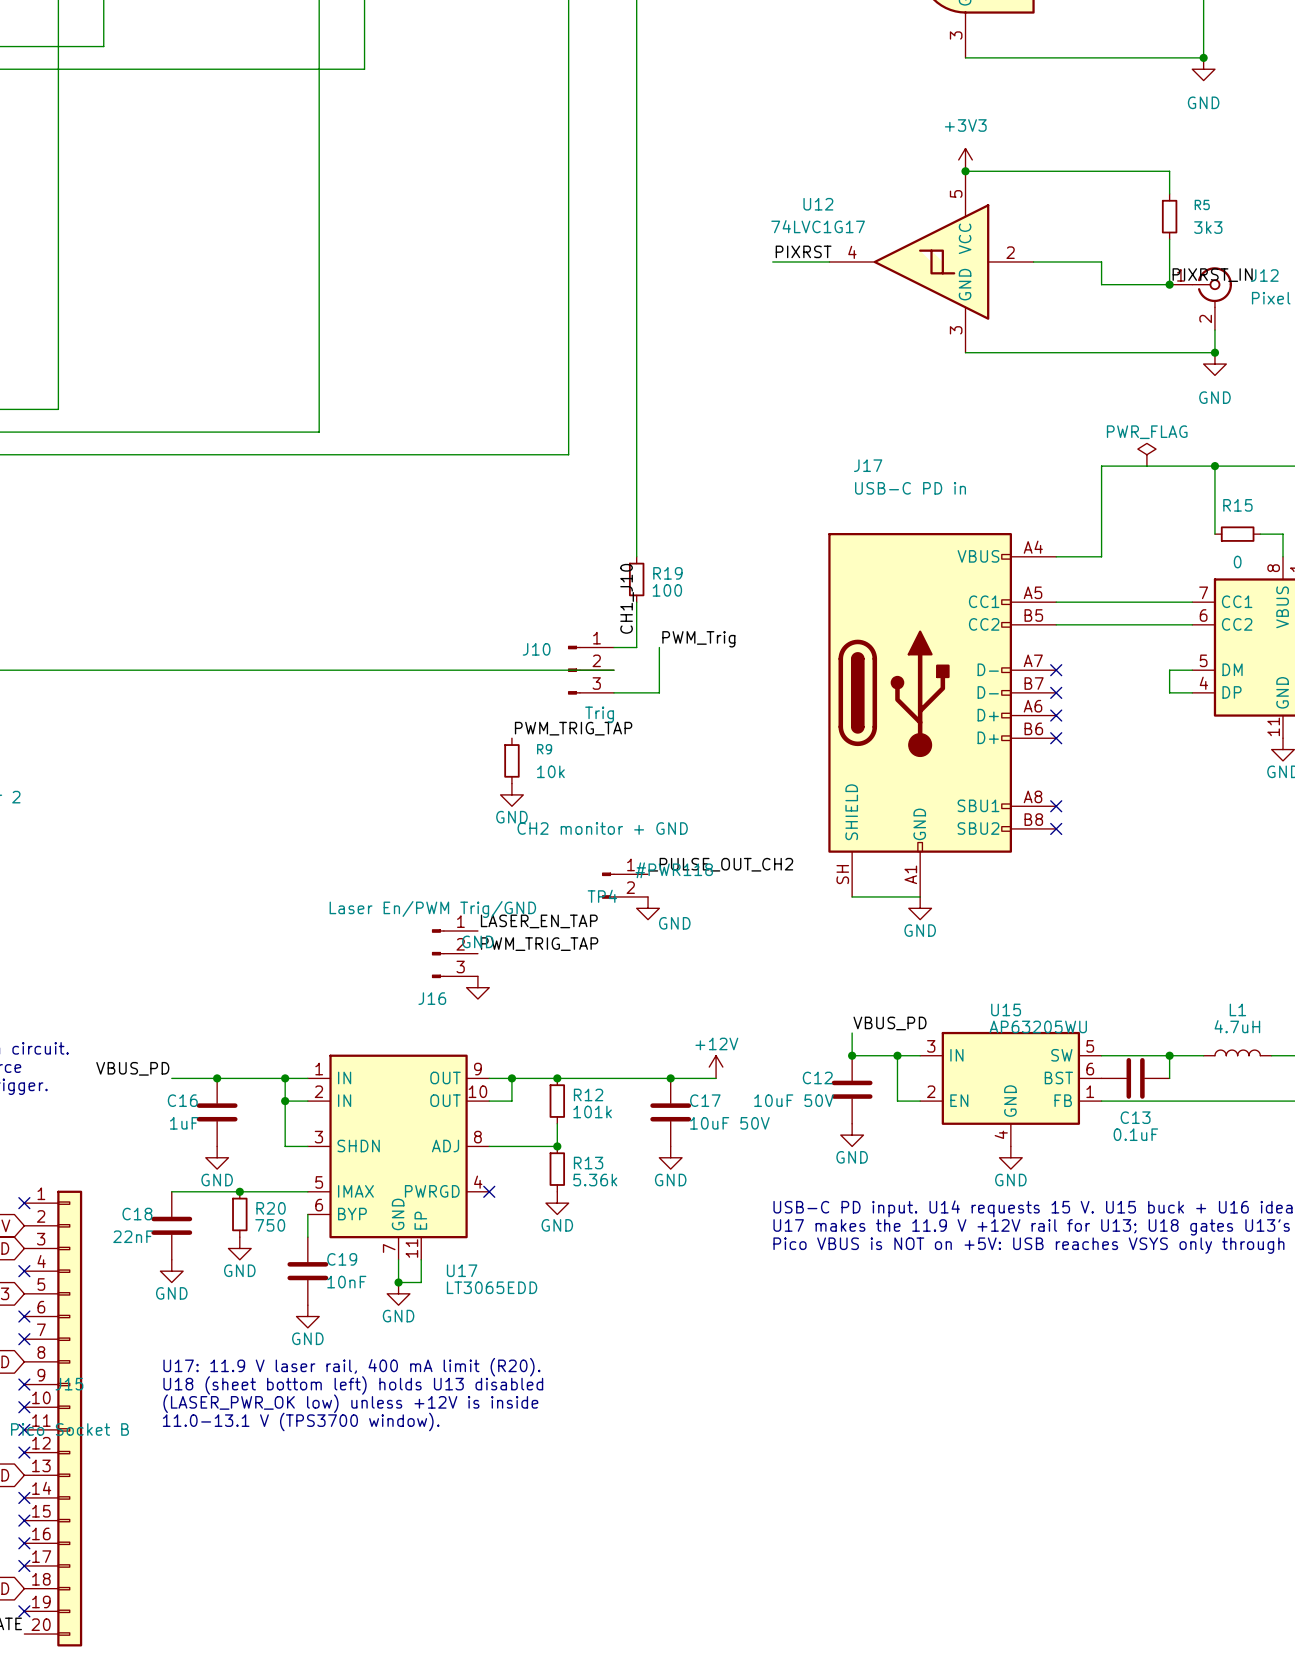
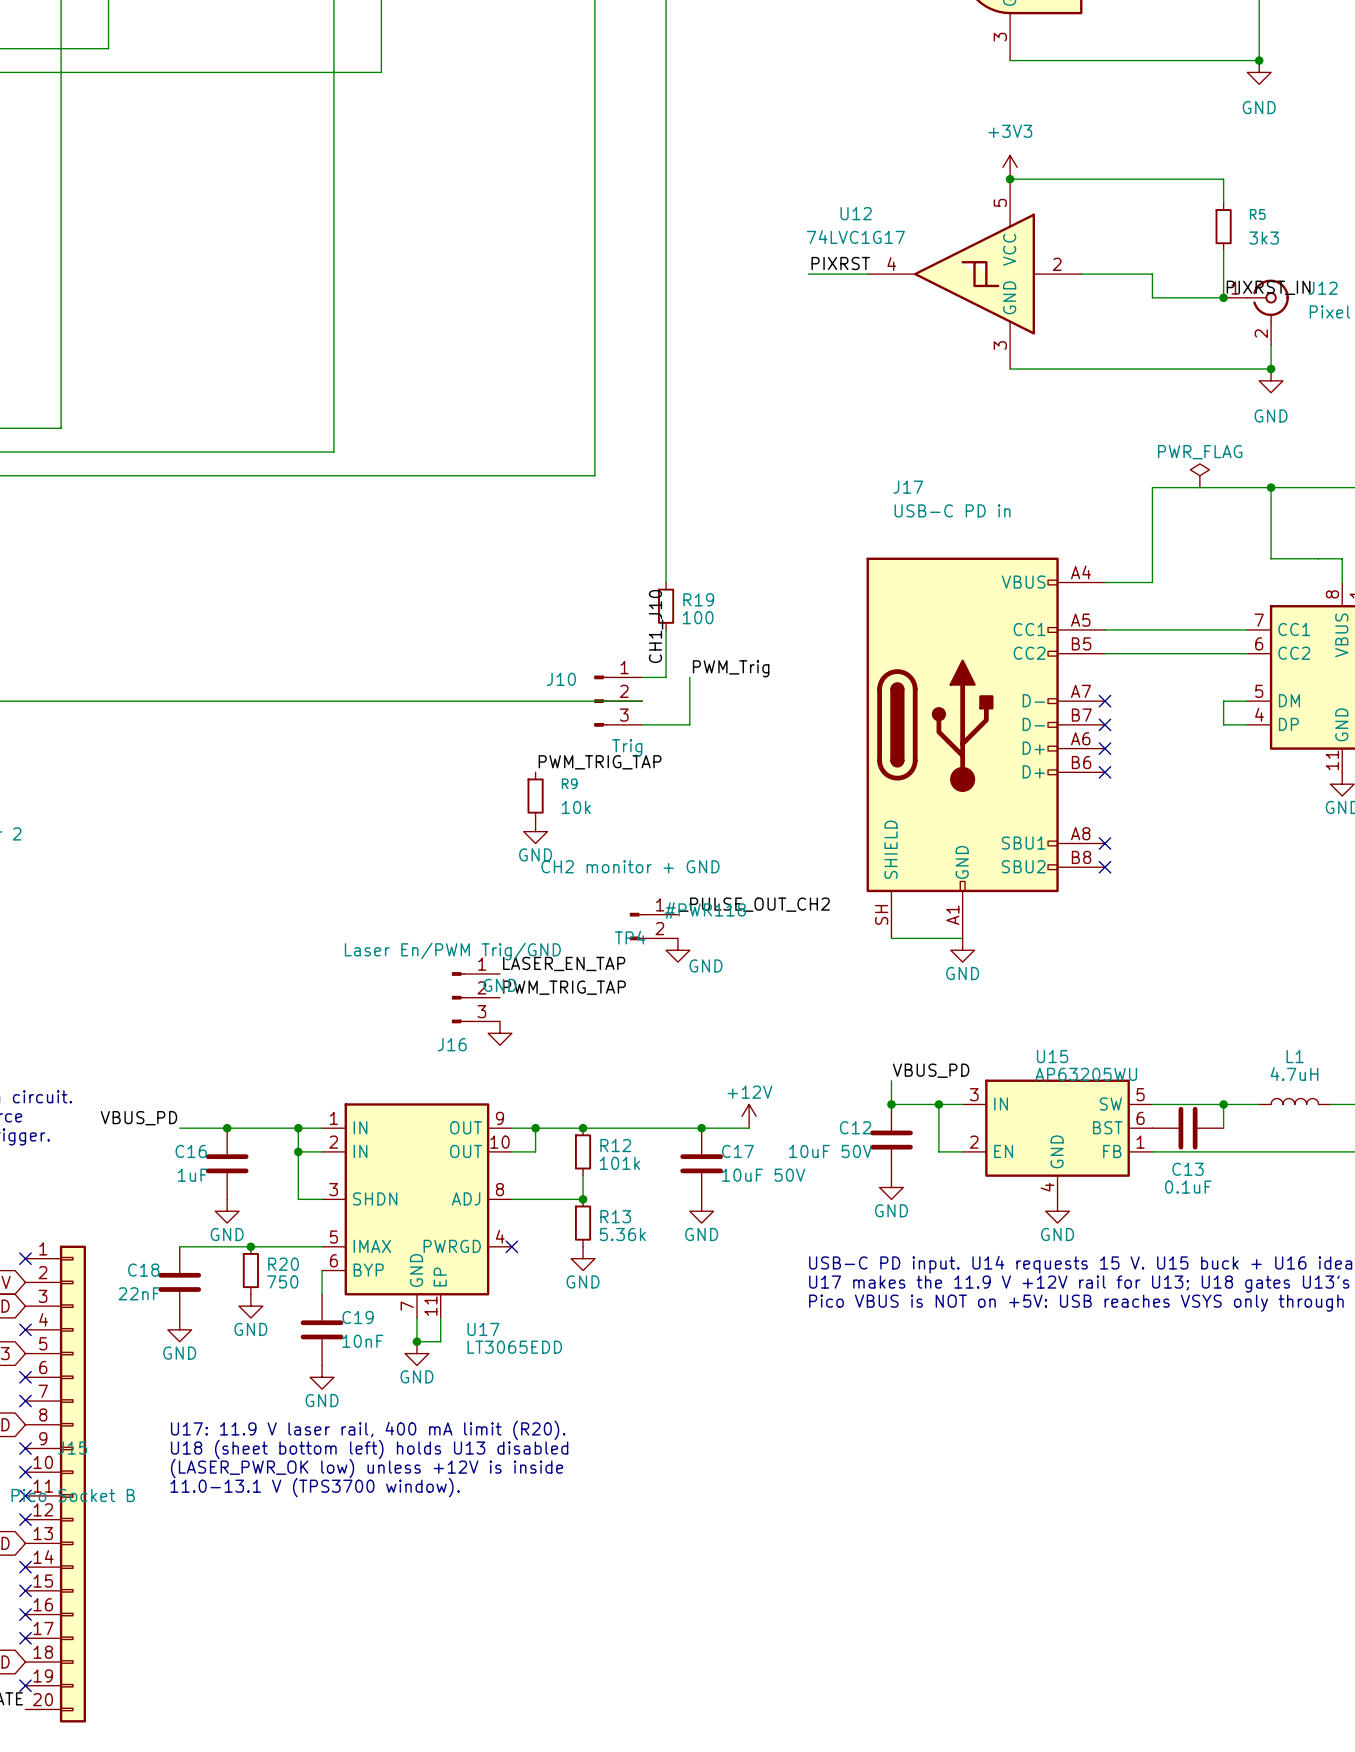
wire: none -> (1271, 558) (1318, 558)
R15: 0 (1237, 534) -> none

